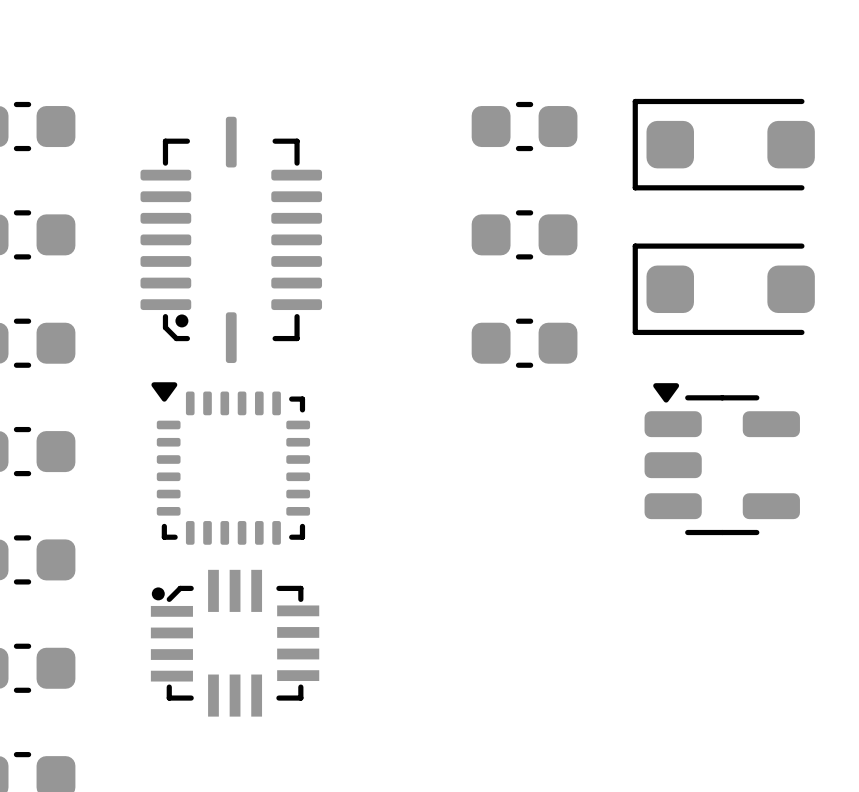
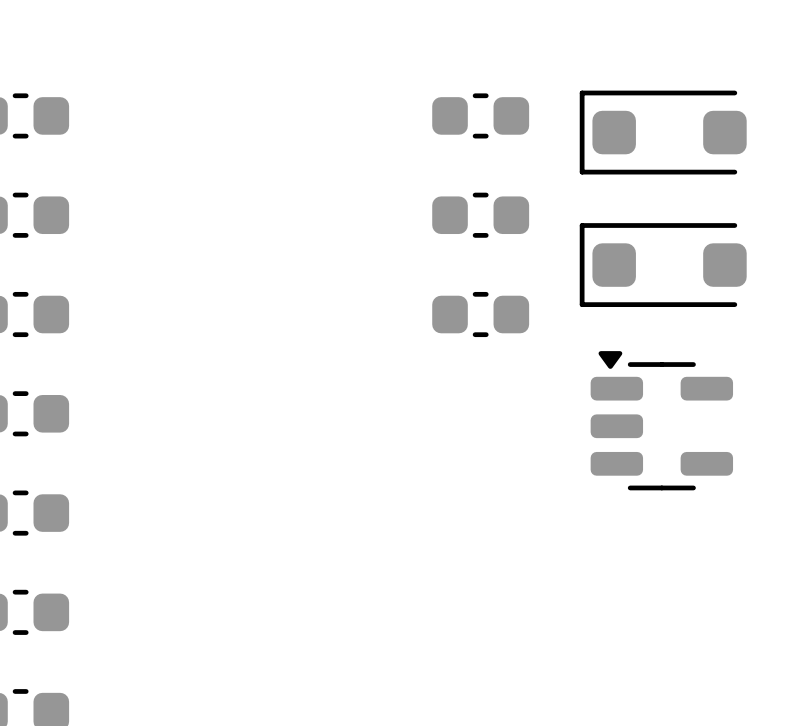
part: (231, 239) -> none
part: (230, 463) -> none
part: (235, 643) -> none

